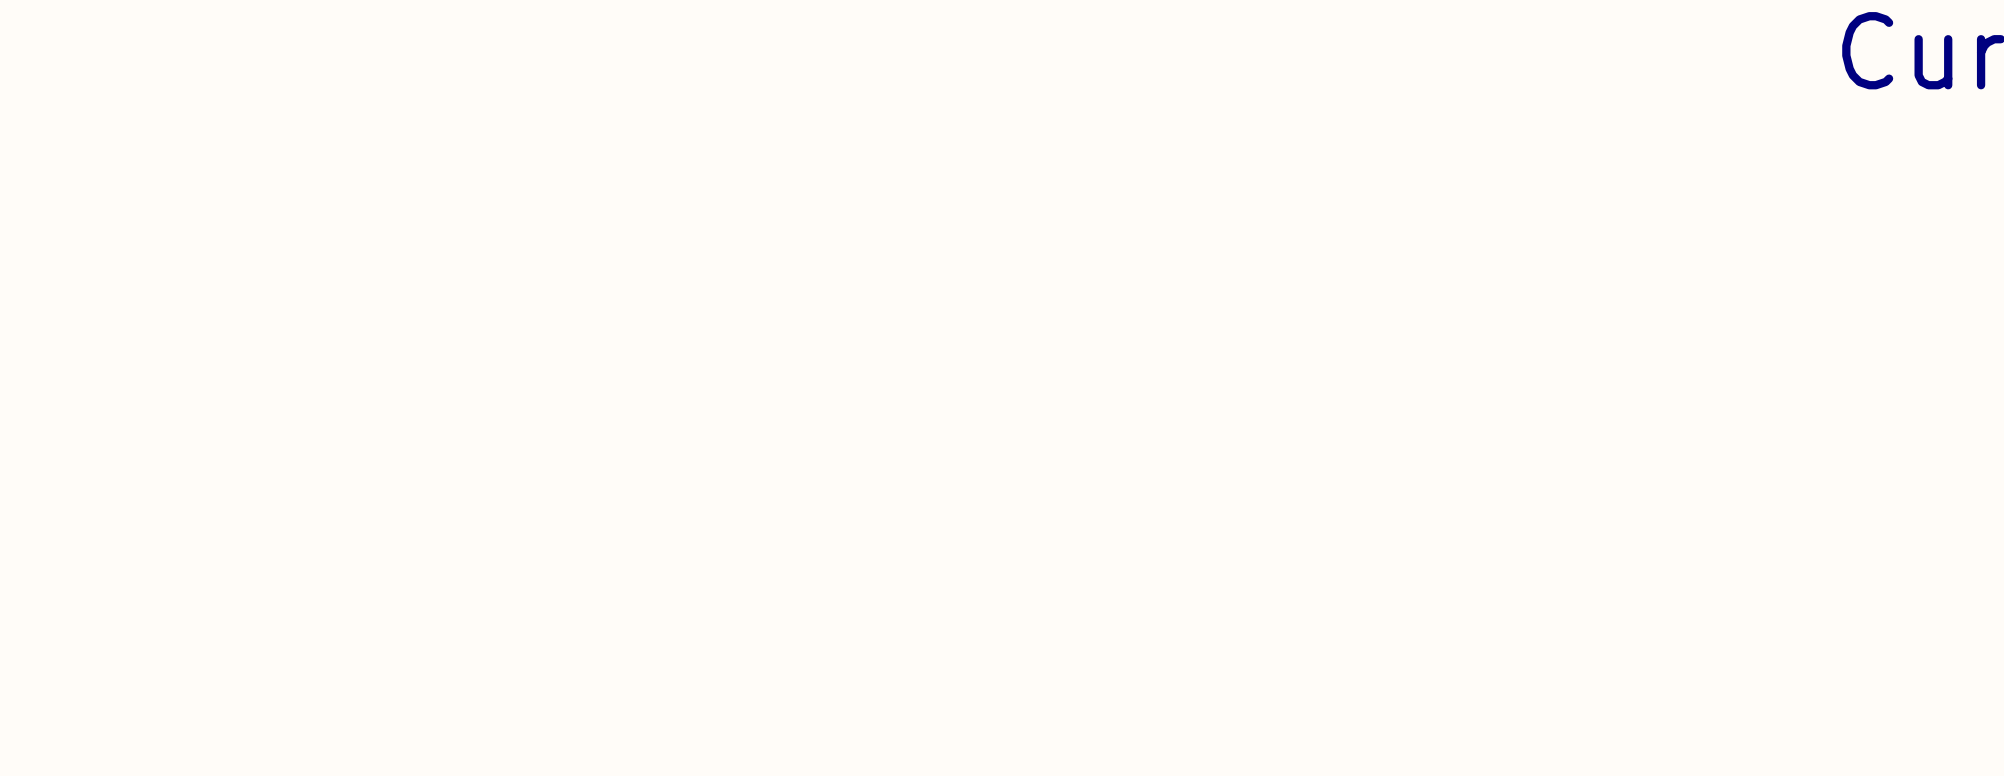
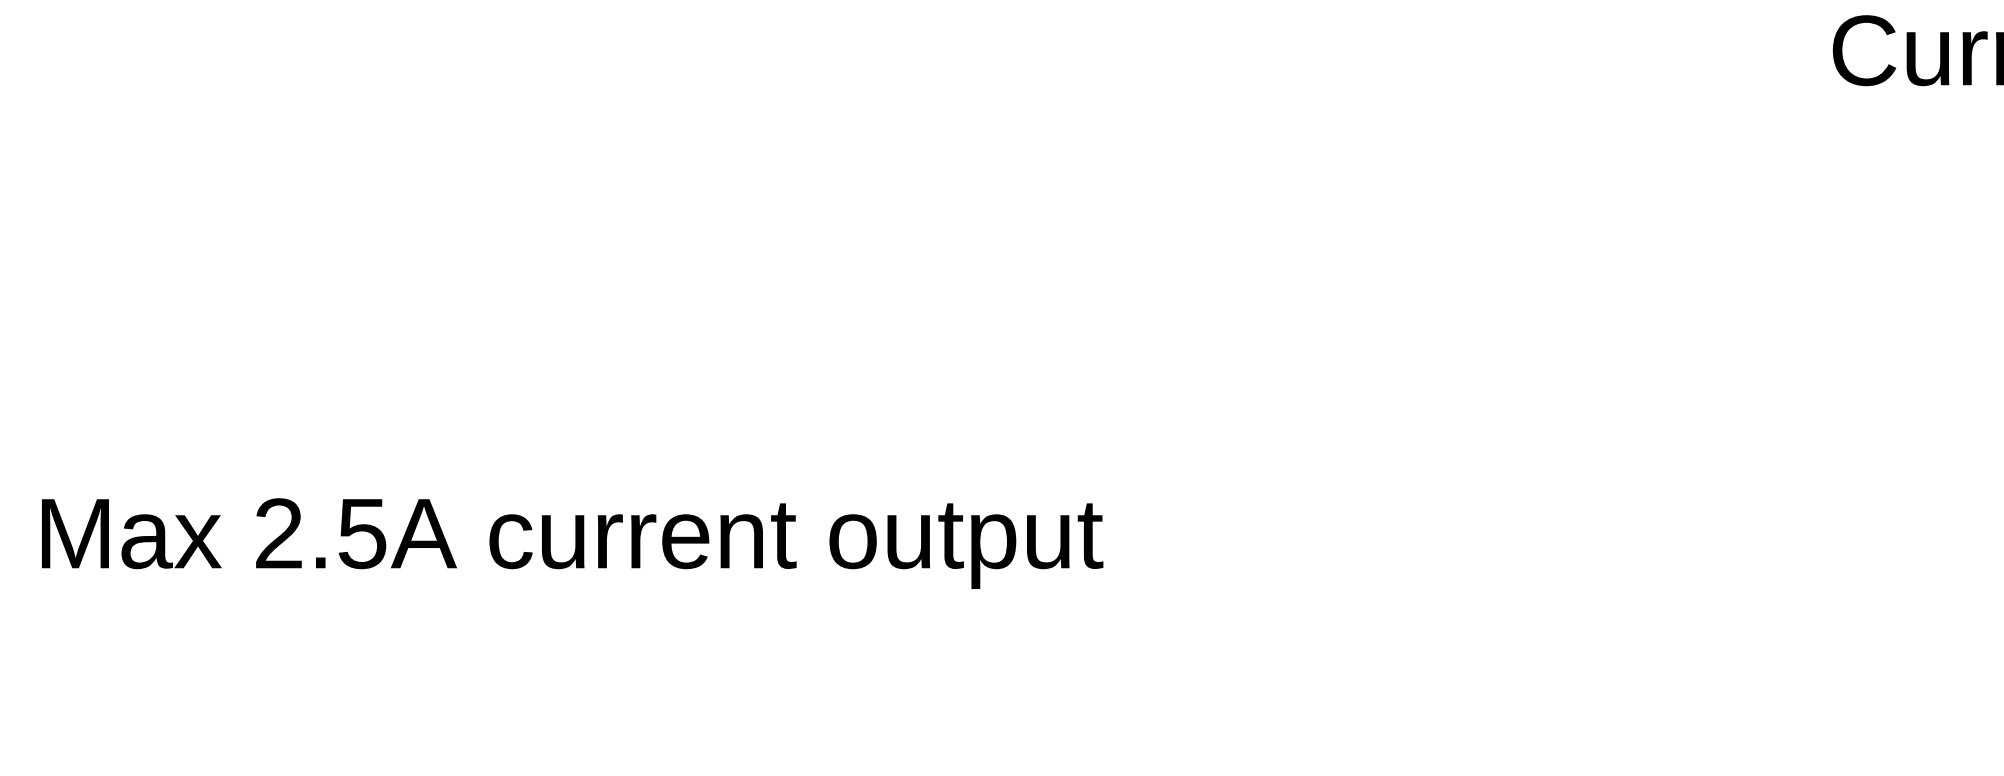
text: none -> Max 2.5A current output (572, 543)

